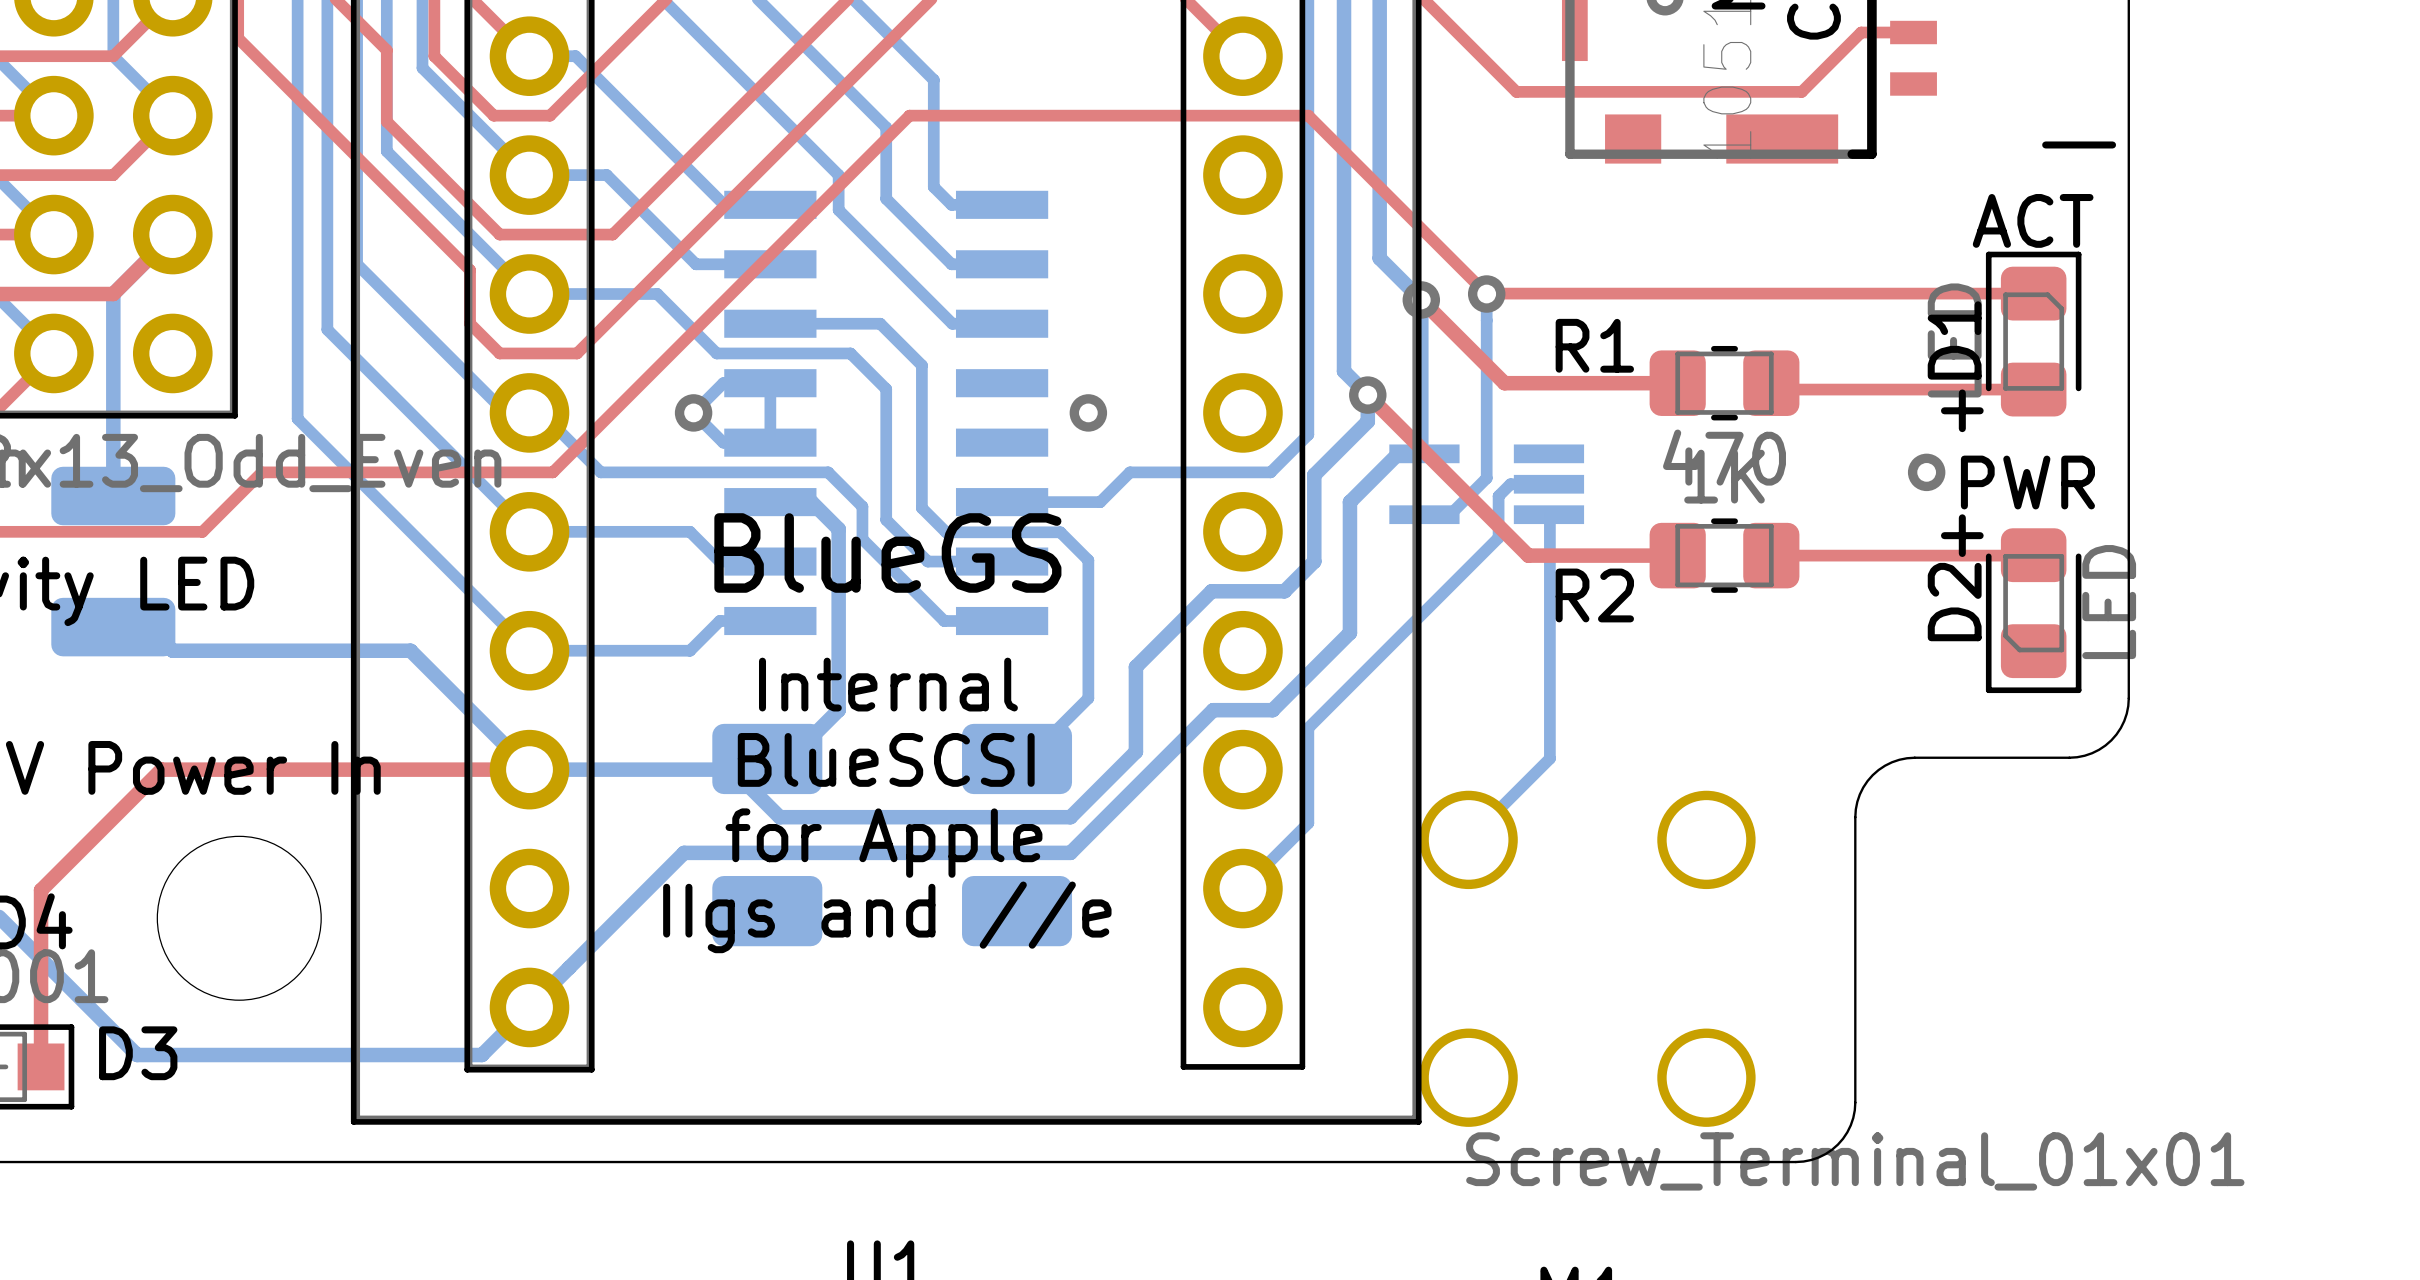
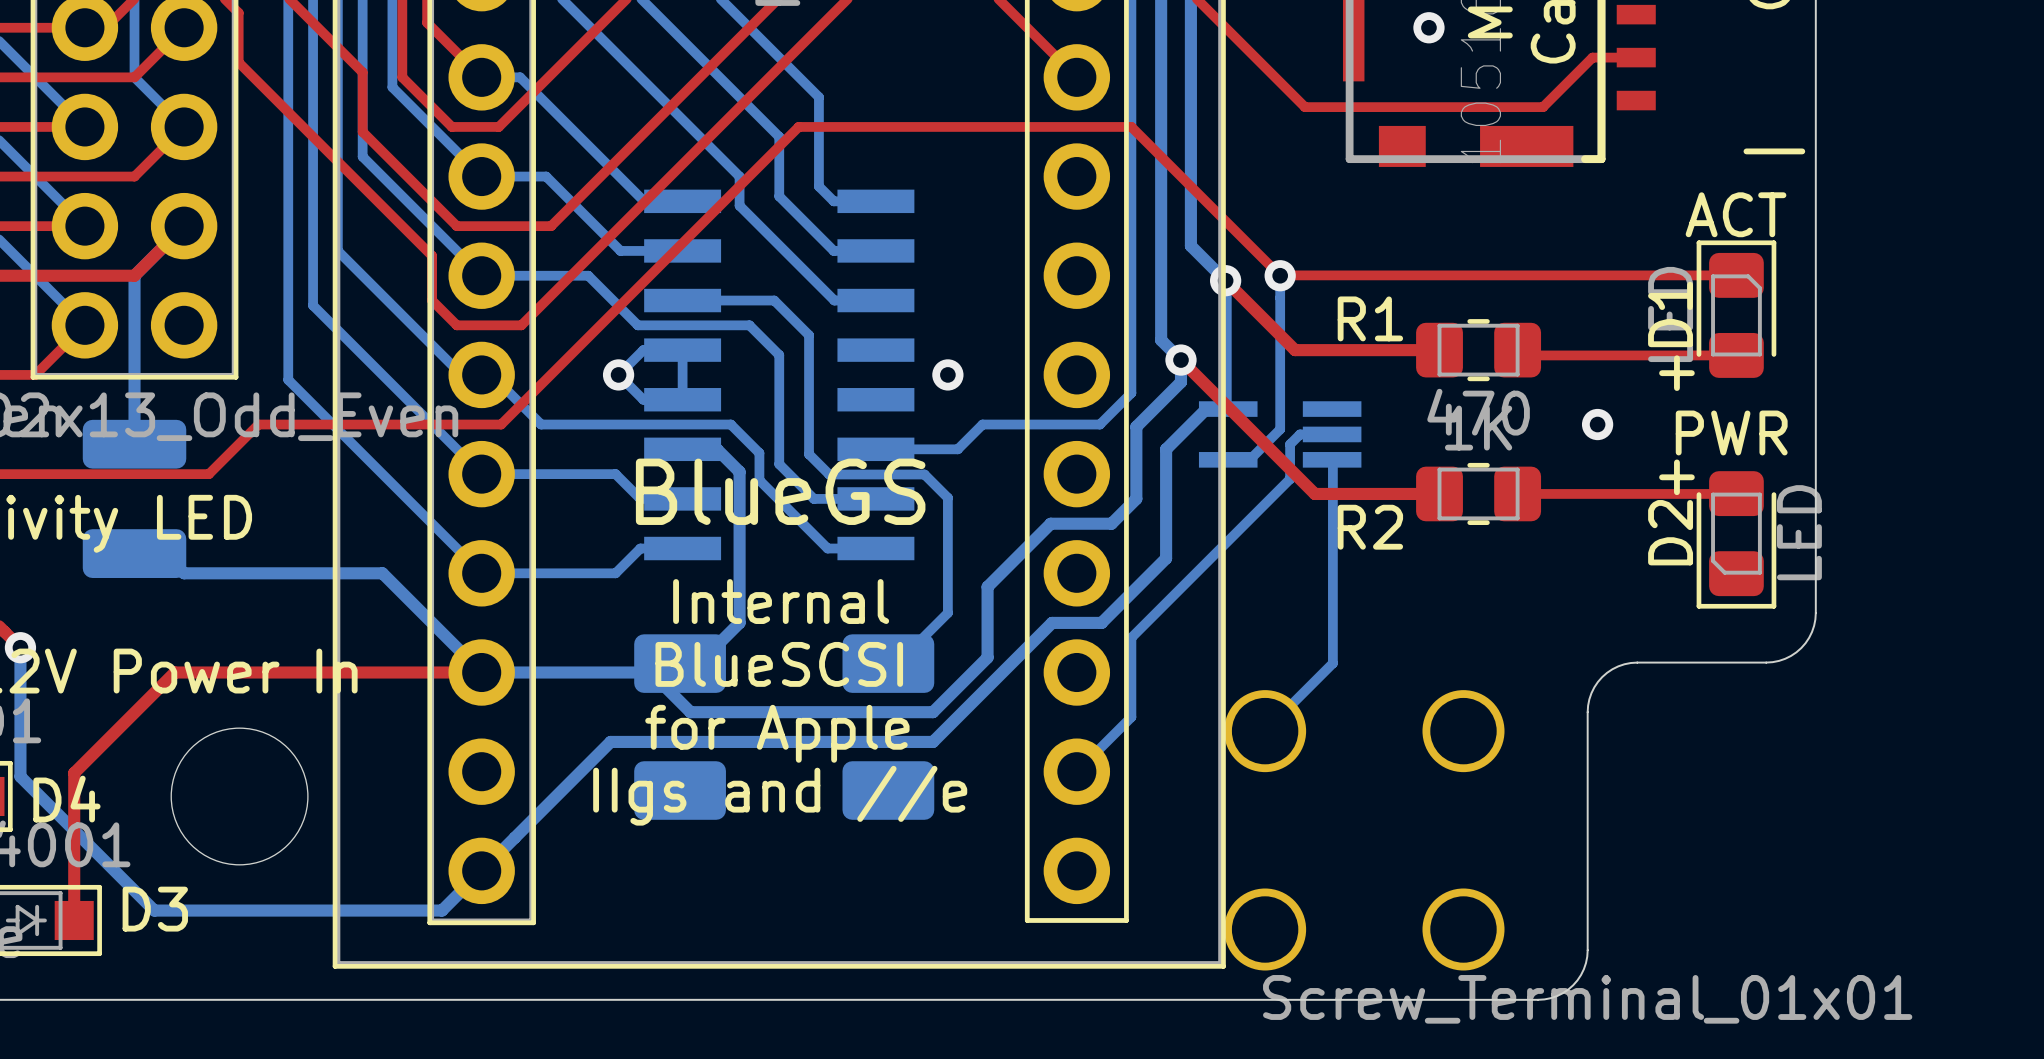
via position: (1926, 472) -> (1597, 424)

